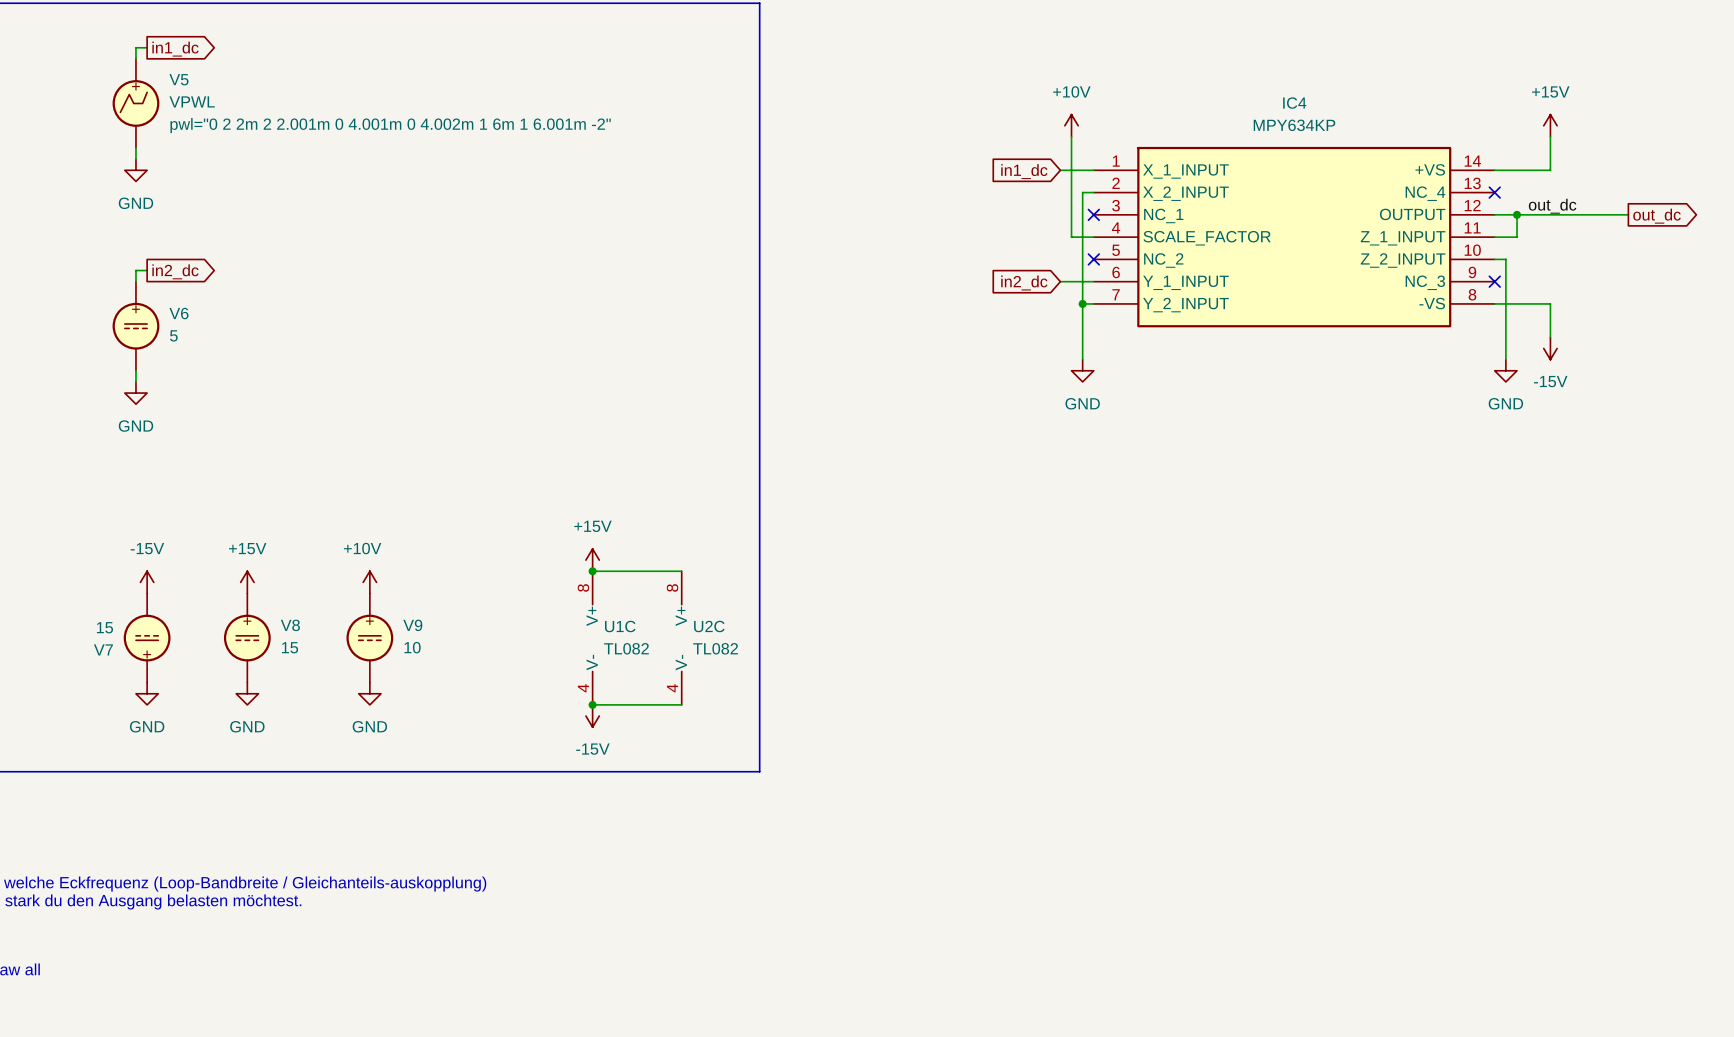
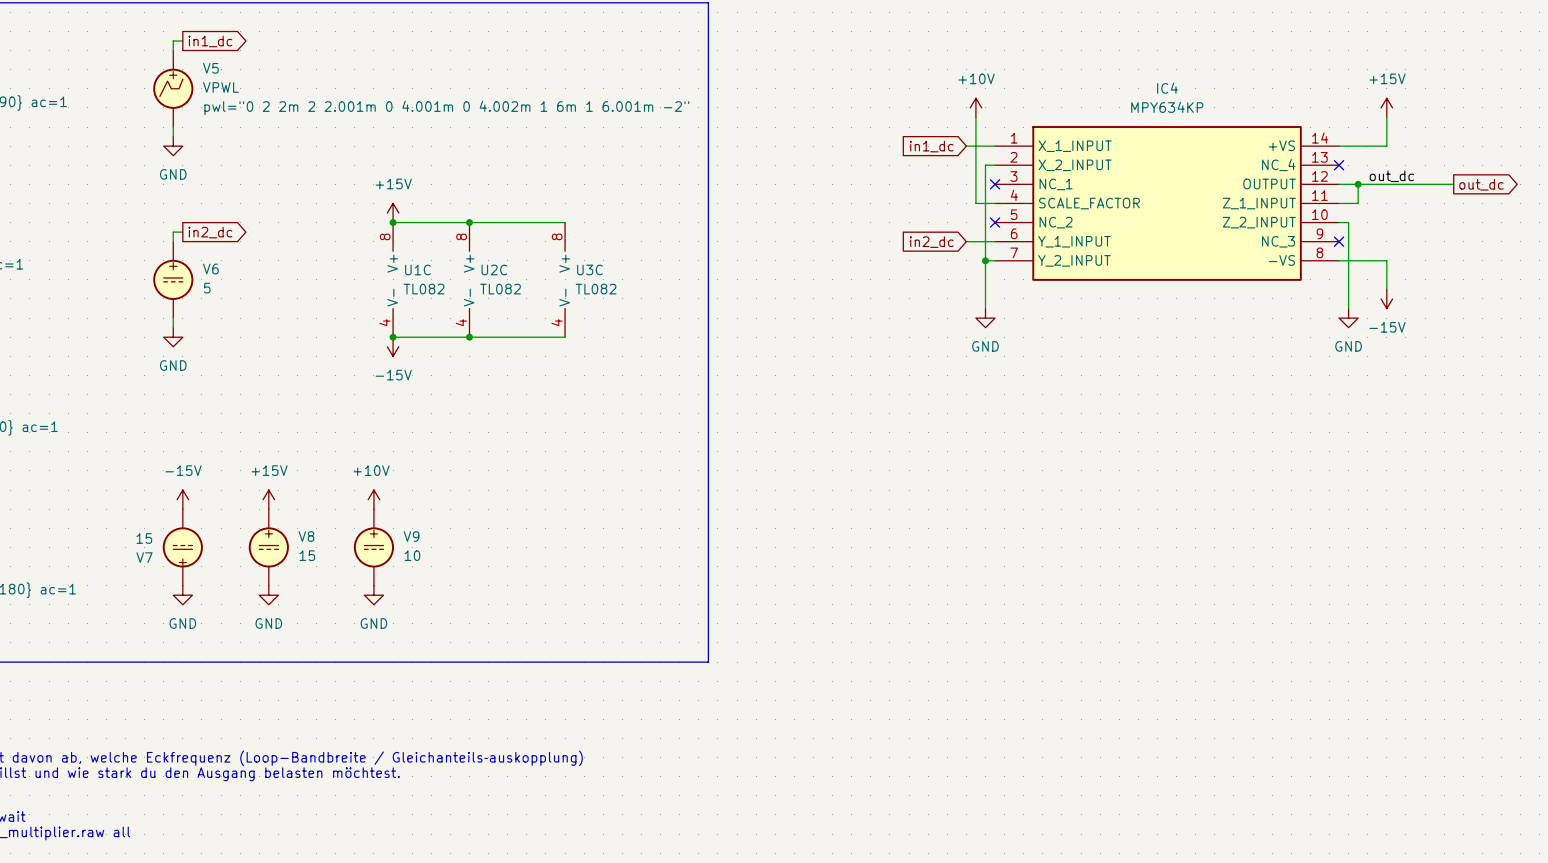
power symbol: none -> +15V (393, 213)
wire: none -> (393, 222) (565, 222)
junction: none -> (393, 222)
junction: none -> (469, 222)
U3C: none -> TL082 (565, 279)
wire: none -> (393, 337) (565, 337)
junction: none -> (393, 337)
junction: none -> (469, 337)
power symbol: none -> -15V (393, 346)
power symbol: +15V (592, 560) -> none
wire: (592, 571) (681, 571) -> none
junction: (592, 571) -> none
U1C position: (592, 638) -> (393, 279)
U2C position: (681, 638) -> (469, 279)
wire: (592, 704) (681, 704) -> none
junction: (592, 704) -> none
power symbol: -15V (592, 716) -> none

